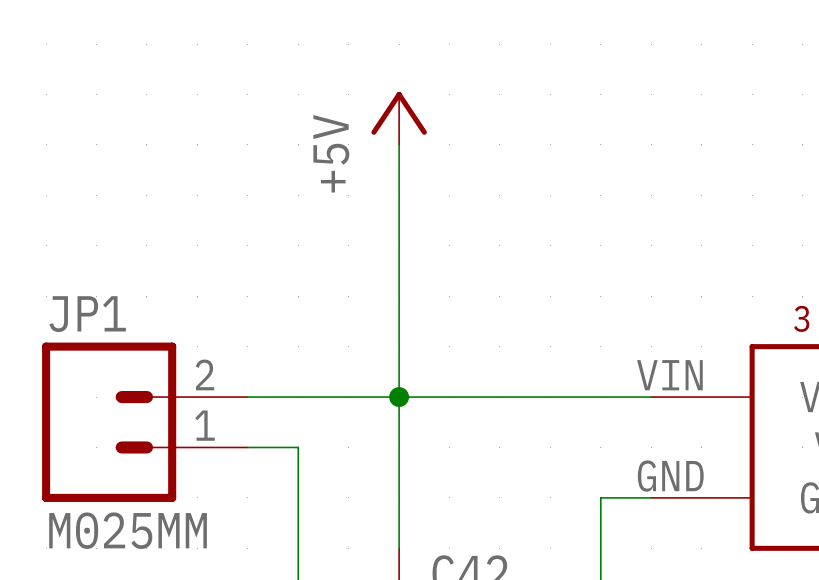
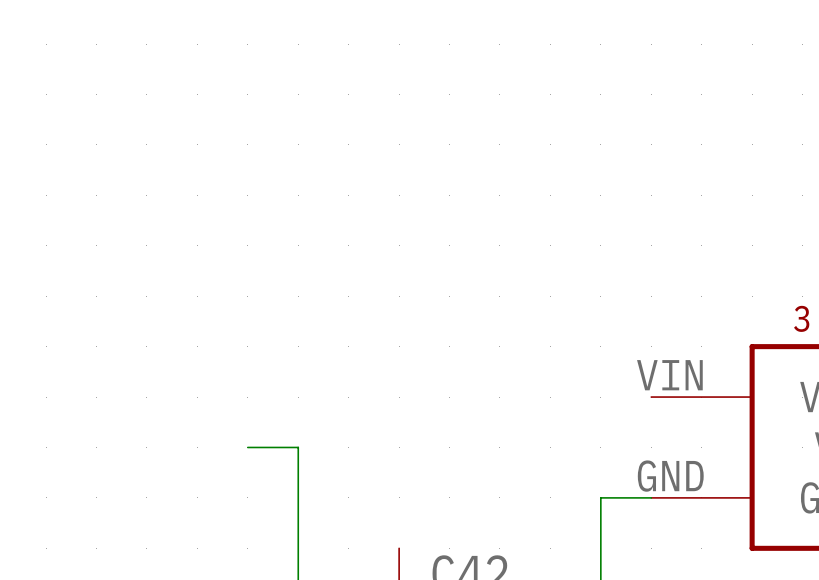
power symbol: +5V (399, 118) -> none
wire: (399, 144) (399, 548) -> none
wire: (247, 397) (651, 397) -> none
junction: (399, 397) -> none
JP1: M025MM (144, 422) -> none

